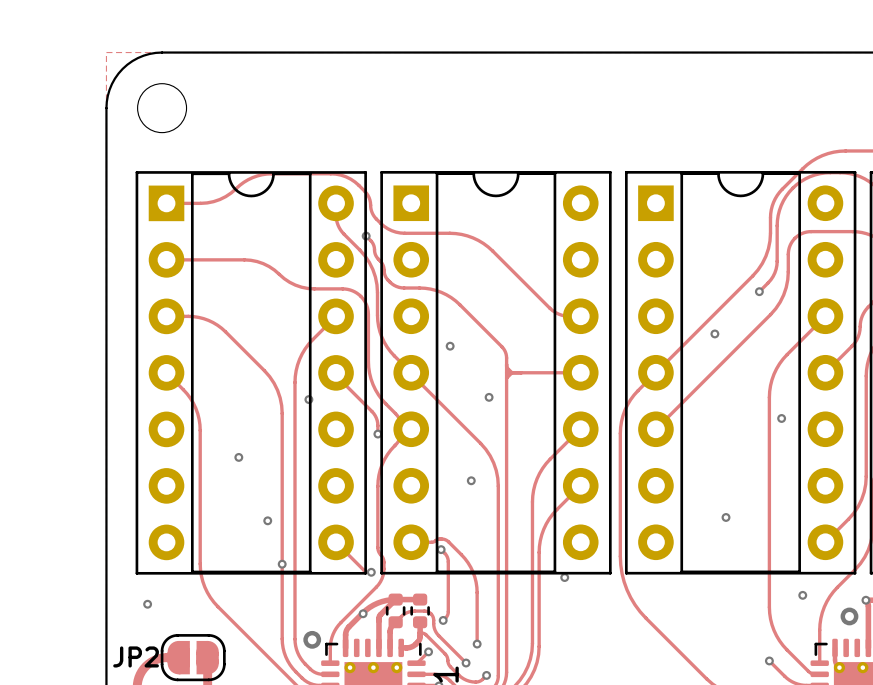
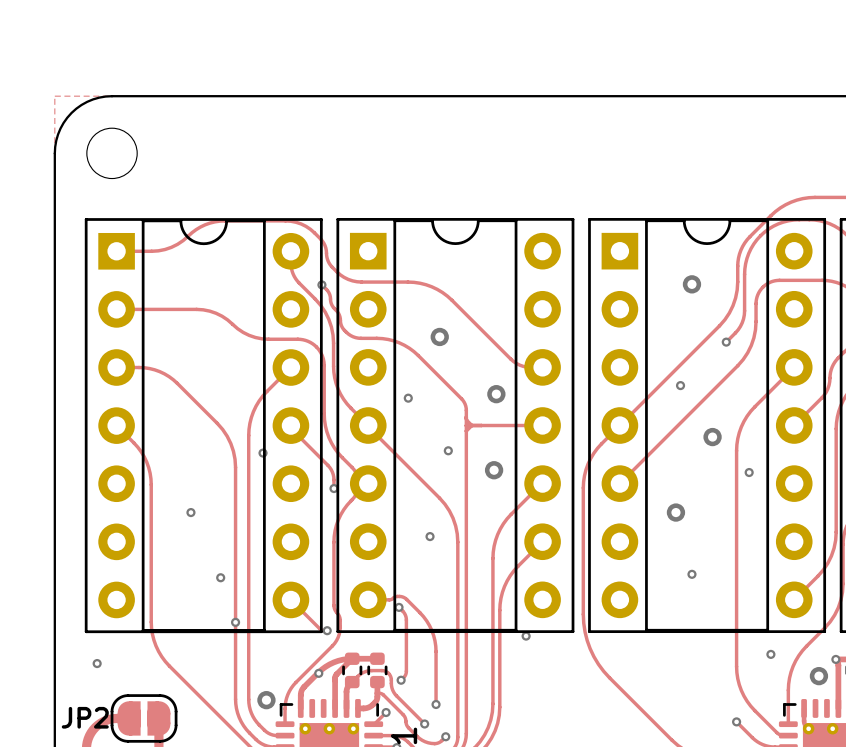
via: none -> (691, 284)
via: none -> (439, 336)
via: none -> (496, 394)
via: none -> (712, 437)
via: none -> (494, 470)
via: none -> (675, 512)

